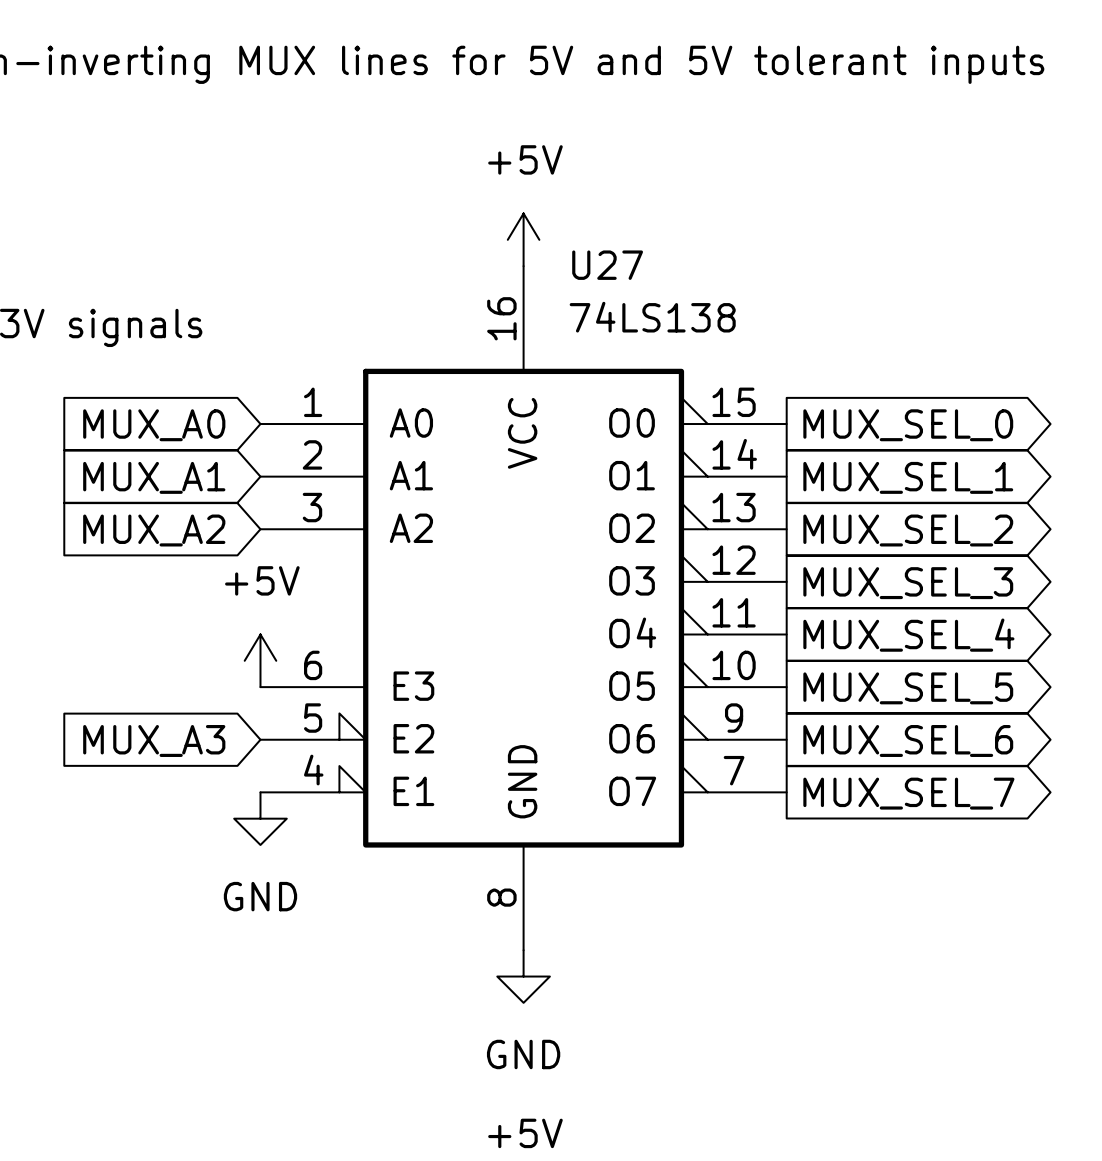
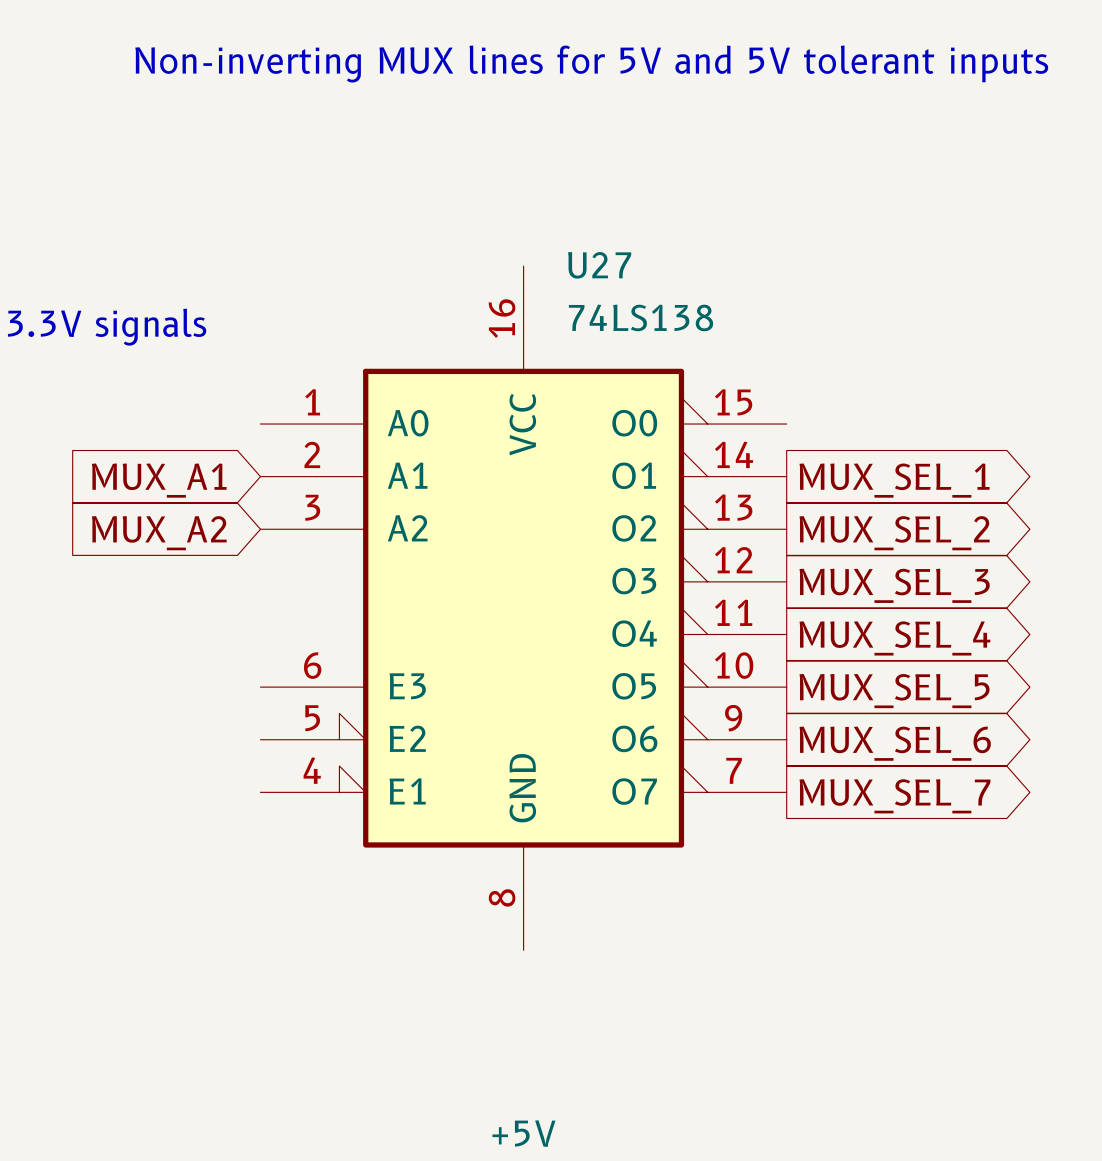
power symbol: +5V (523, 239) -> none
global label: MUX_A0 (154, 425) -> none
global label: MUX_SEL_0 (908, 425) -> none
power symbol: +5V (260, 660) -> none
global label: MUX_A3 (154, 740) -> none
power symbol: GND (260, 818) -> none
power symbol: GND (523, 976) -> none

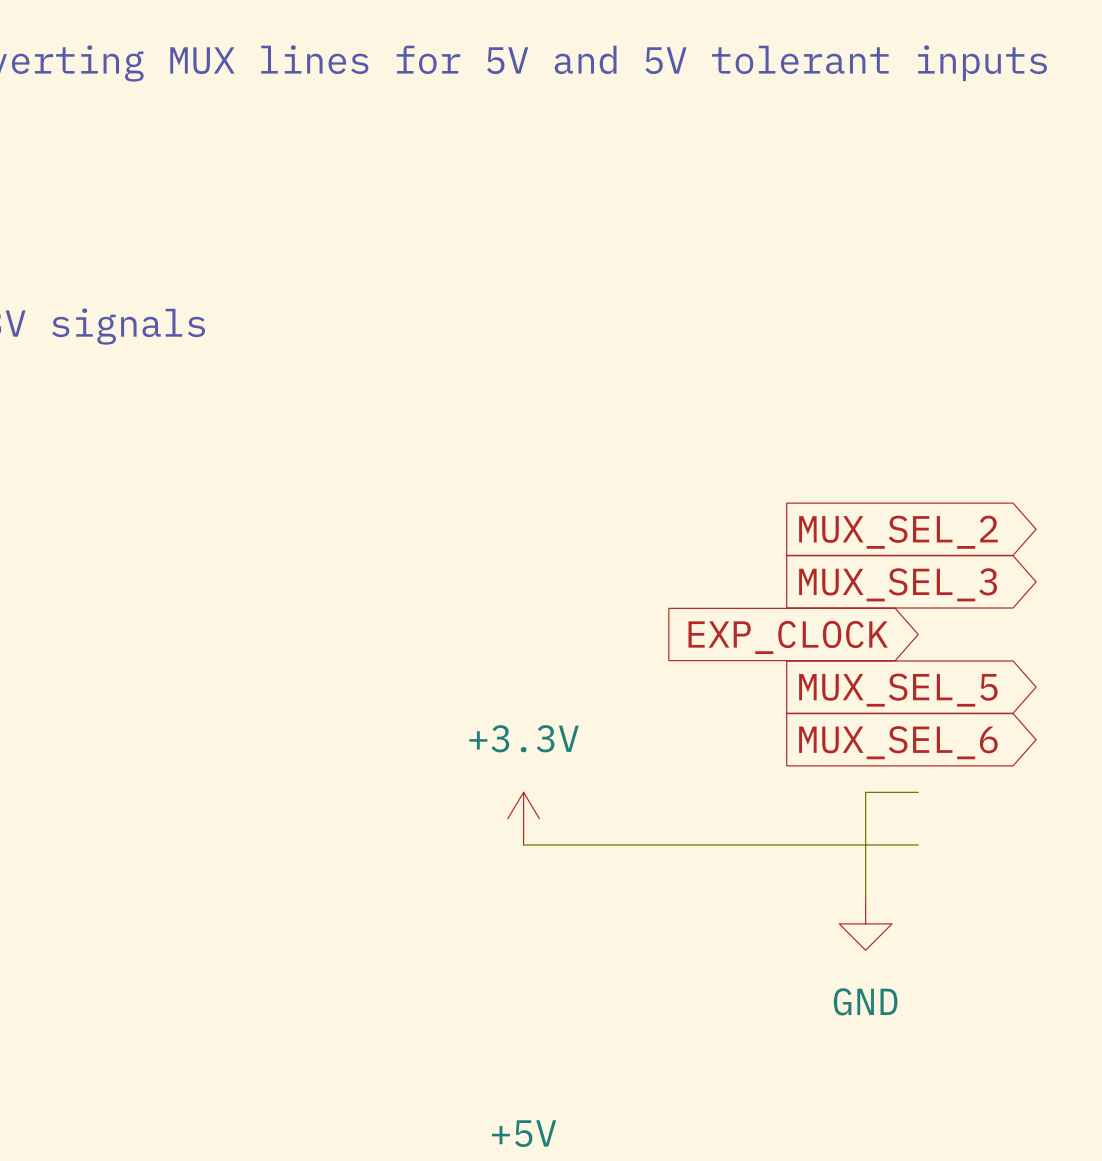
global label: MUX_A1 (159, 480) -> none
global label: MUX_SEL_1 (894, 480) -> none
global label: MUX_A2 (159, 533) -> none
U27: 74LS138 (523, 608) -> none
global label: none -> EXP_CLOCK (788, 637)
global label: MUX_SEL_4 (894, 638) -> none
wire: none -> (918, 792) (865, 792) (865, 897)
global label: MUX_SEL_7 (894, 796) -> none
power symbol: none -> +3.3V (523, 818)
wire: none -> (523, 844) (918, 844)
power symbol: none -> GND (865, 923)

